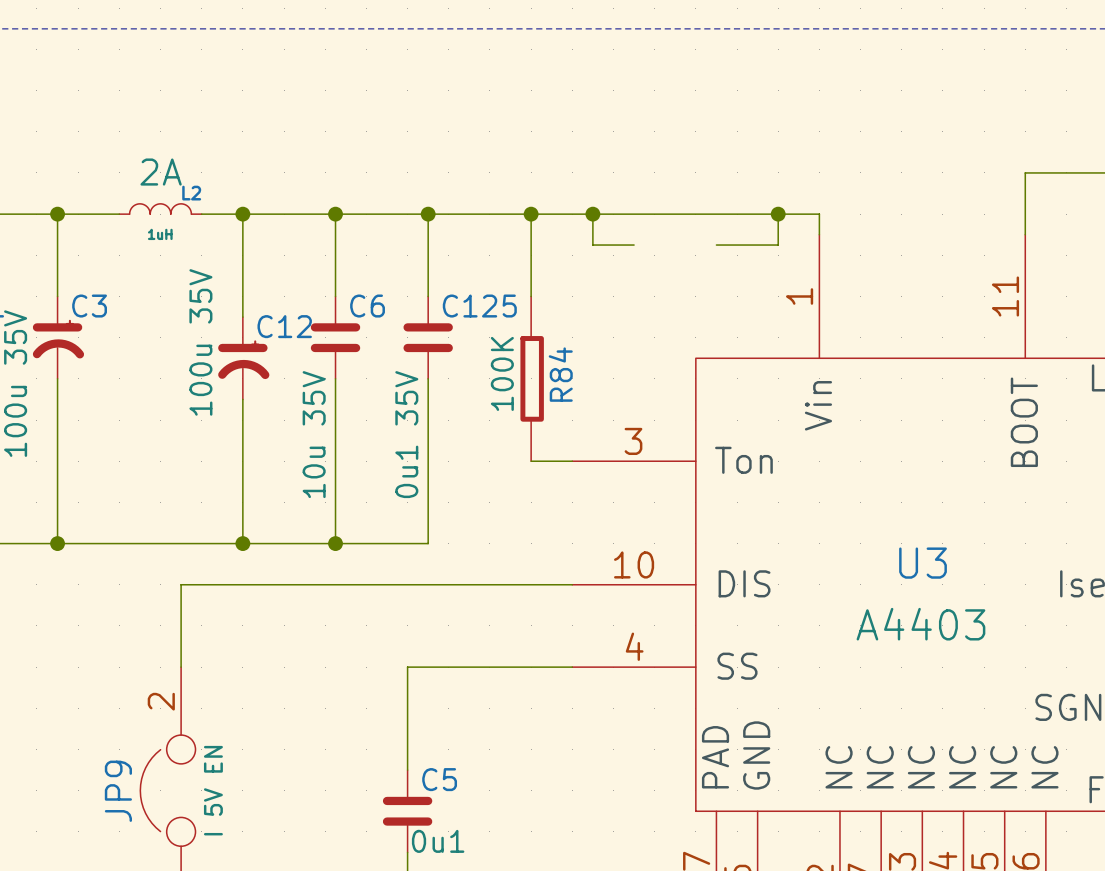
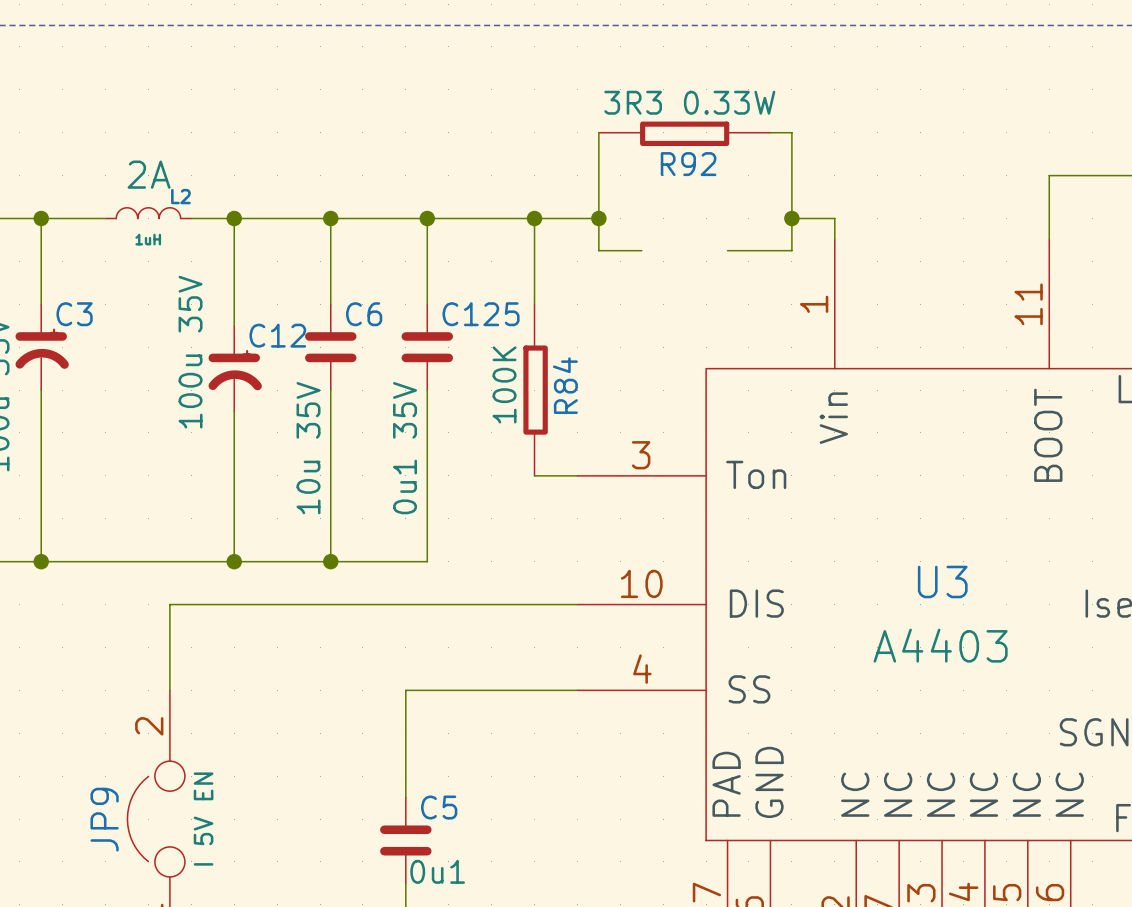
wire: none -> (598, 132) (598, 218)
R92: none -> 3R3 0.33W (684, 133)
wire: (592, 214) (778, 214) -> (770, 132) (791, 132) (791, 218)

